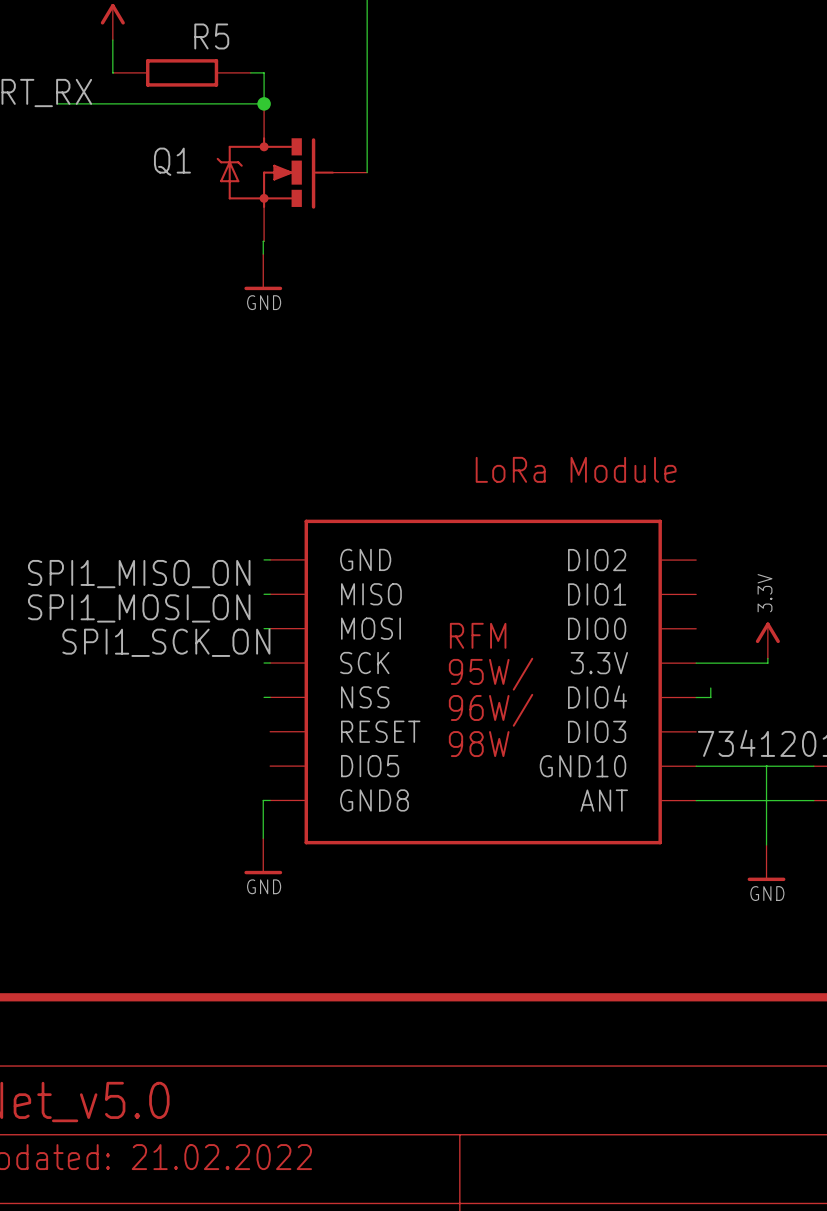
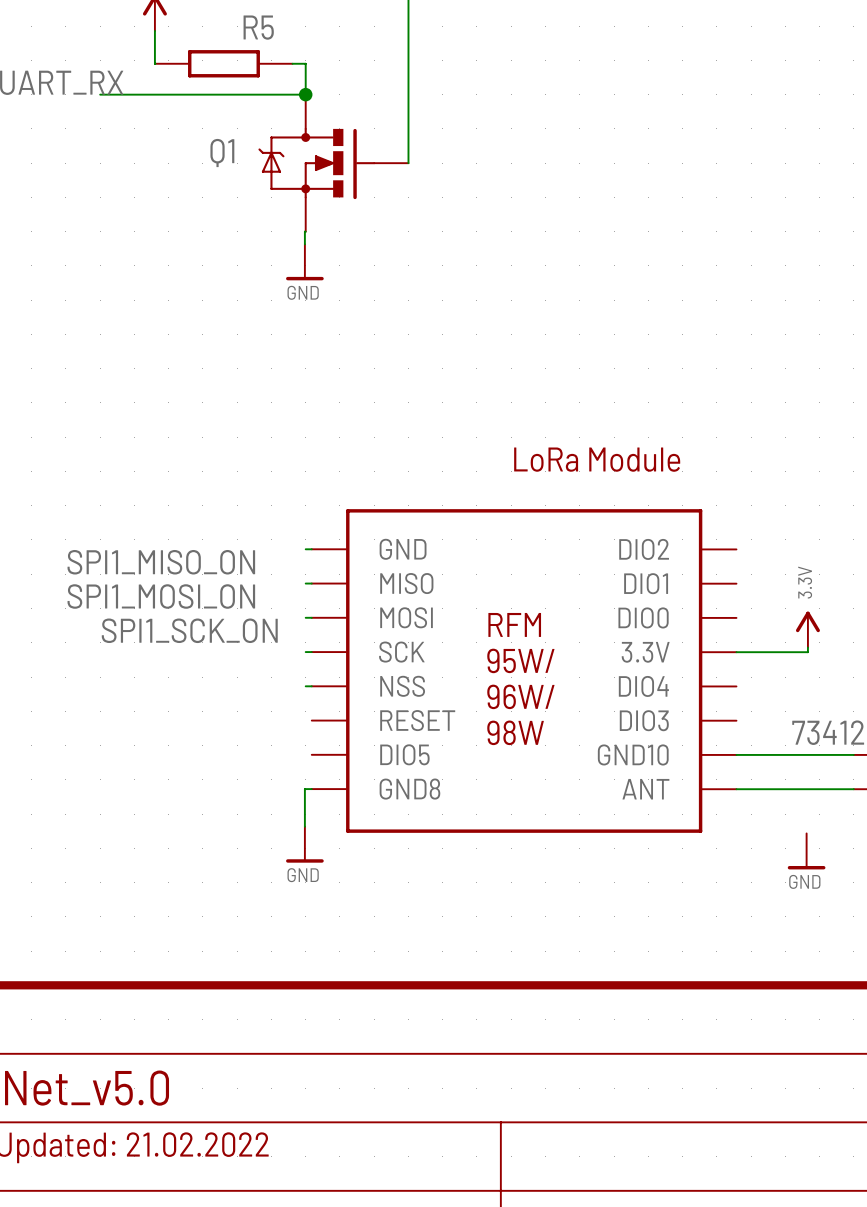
wire: (710, 688) (710, 697) (696, 697) -> none
wire: (766, 765) (766, 844) -> none

